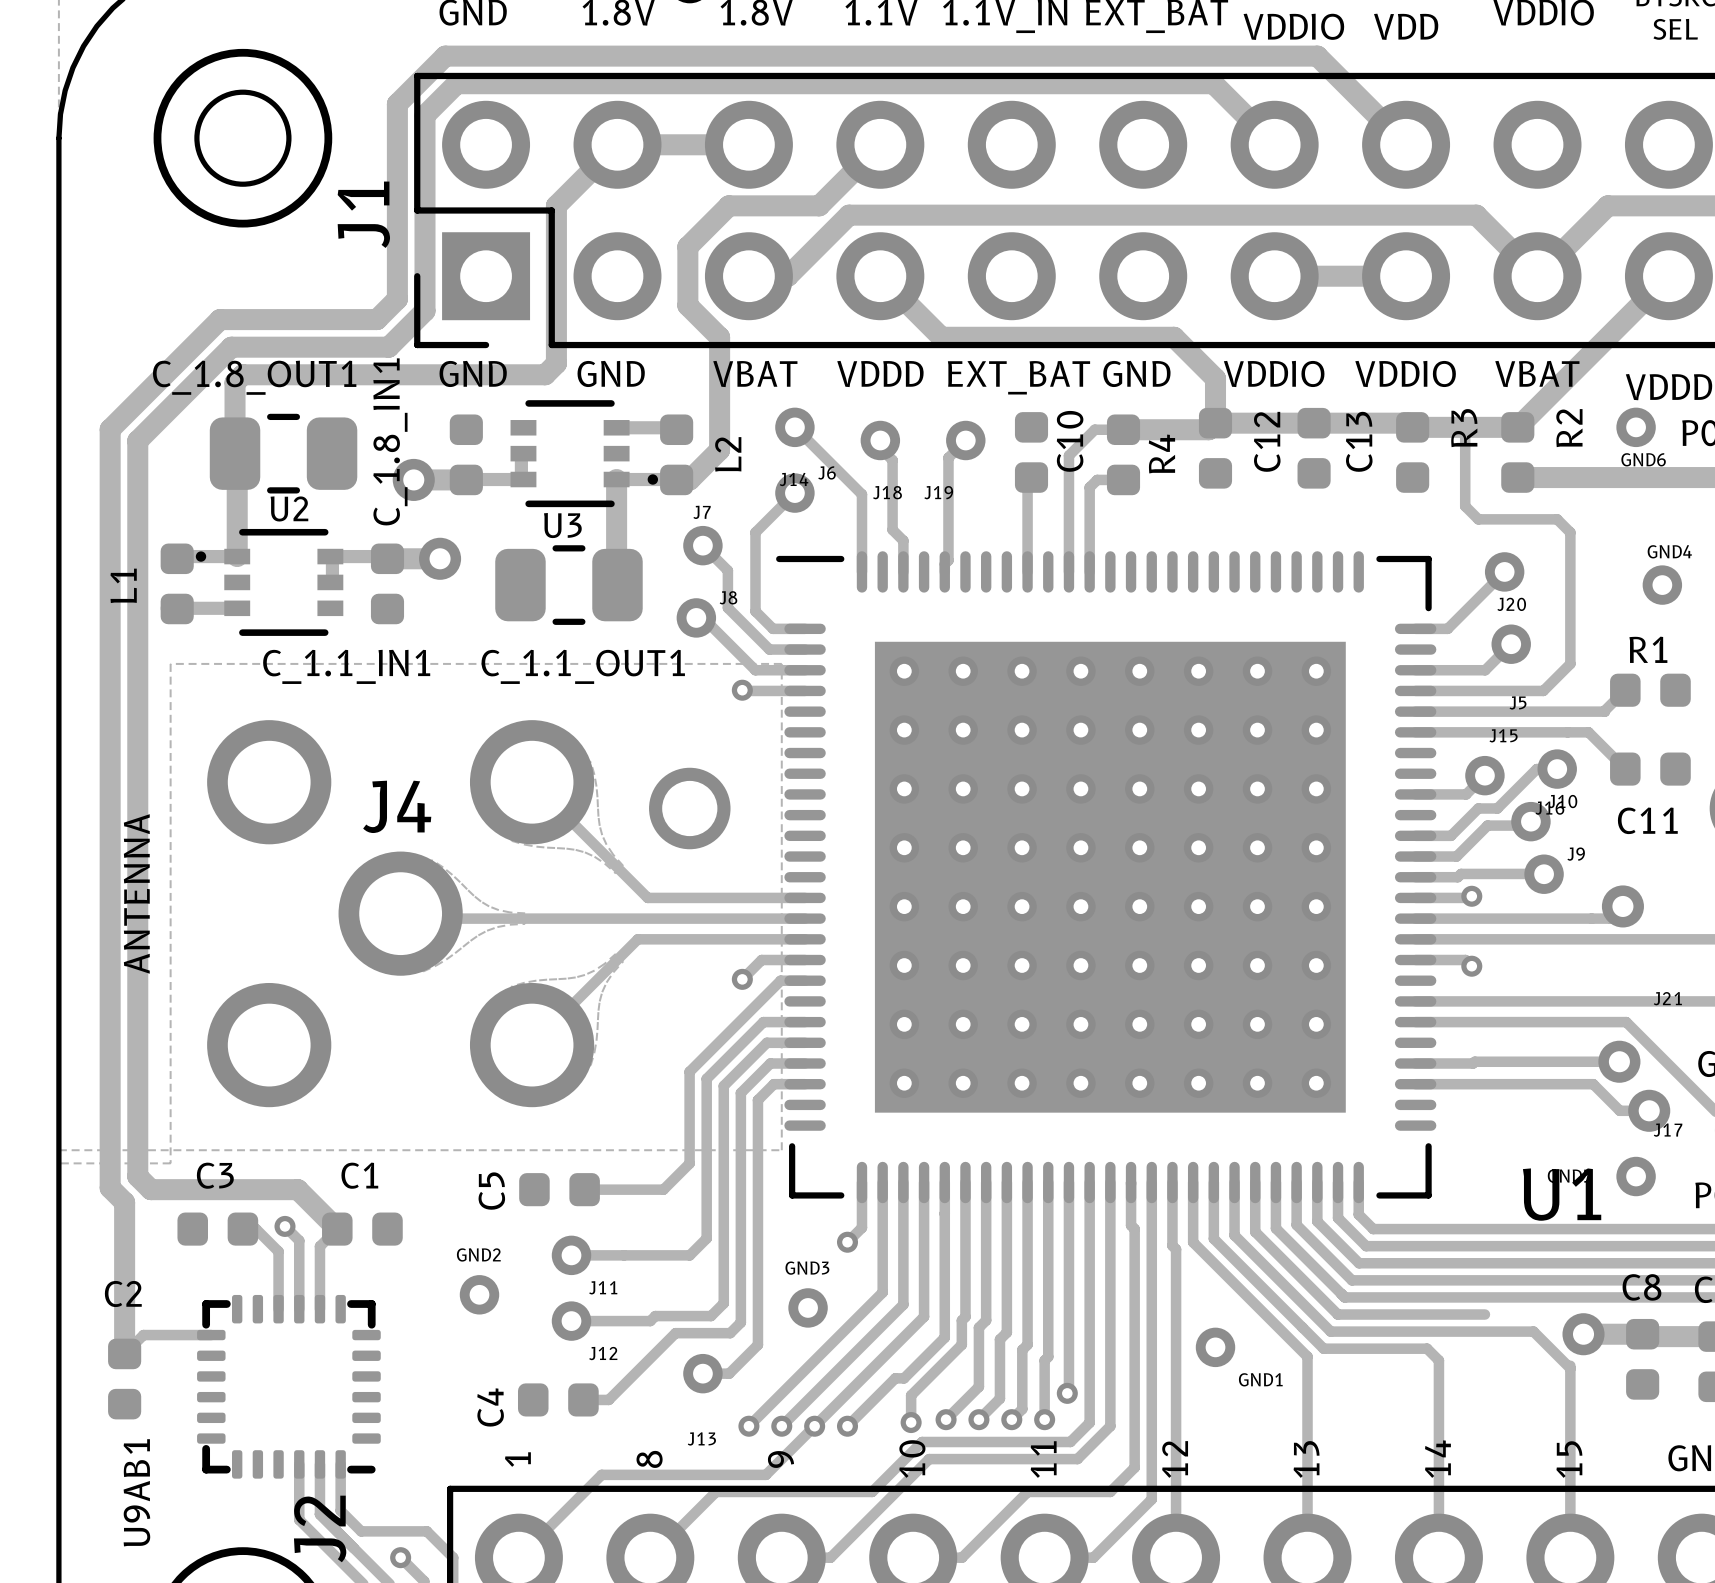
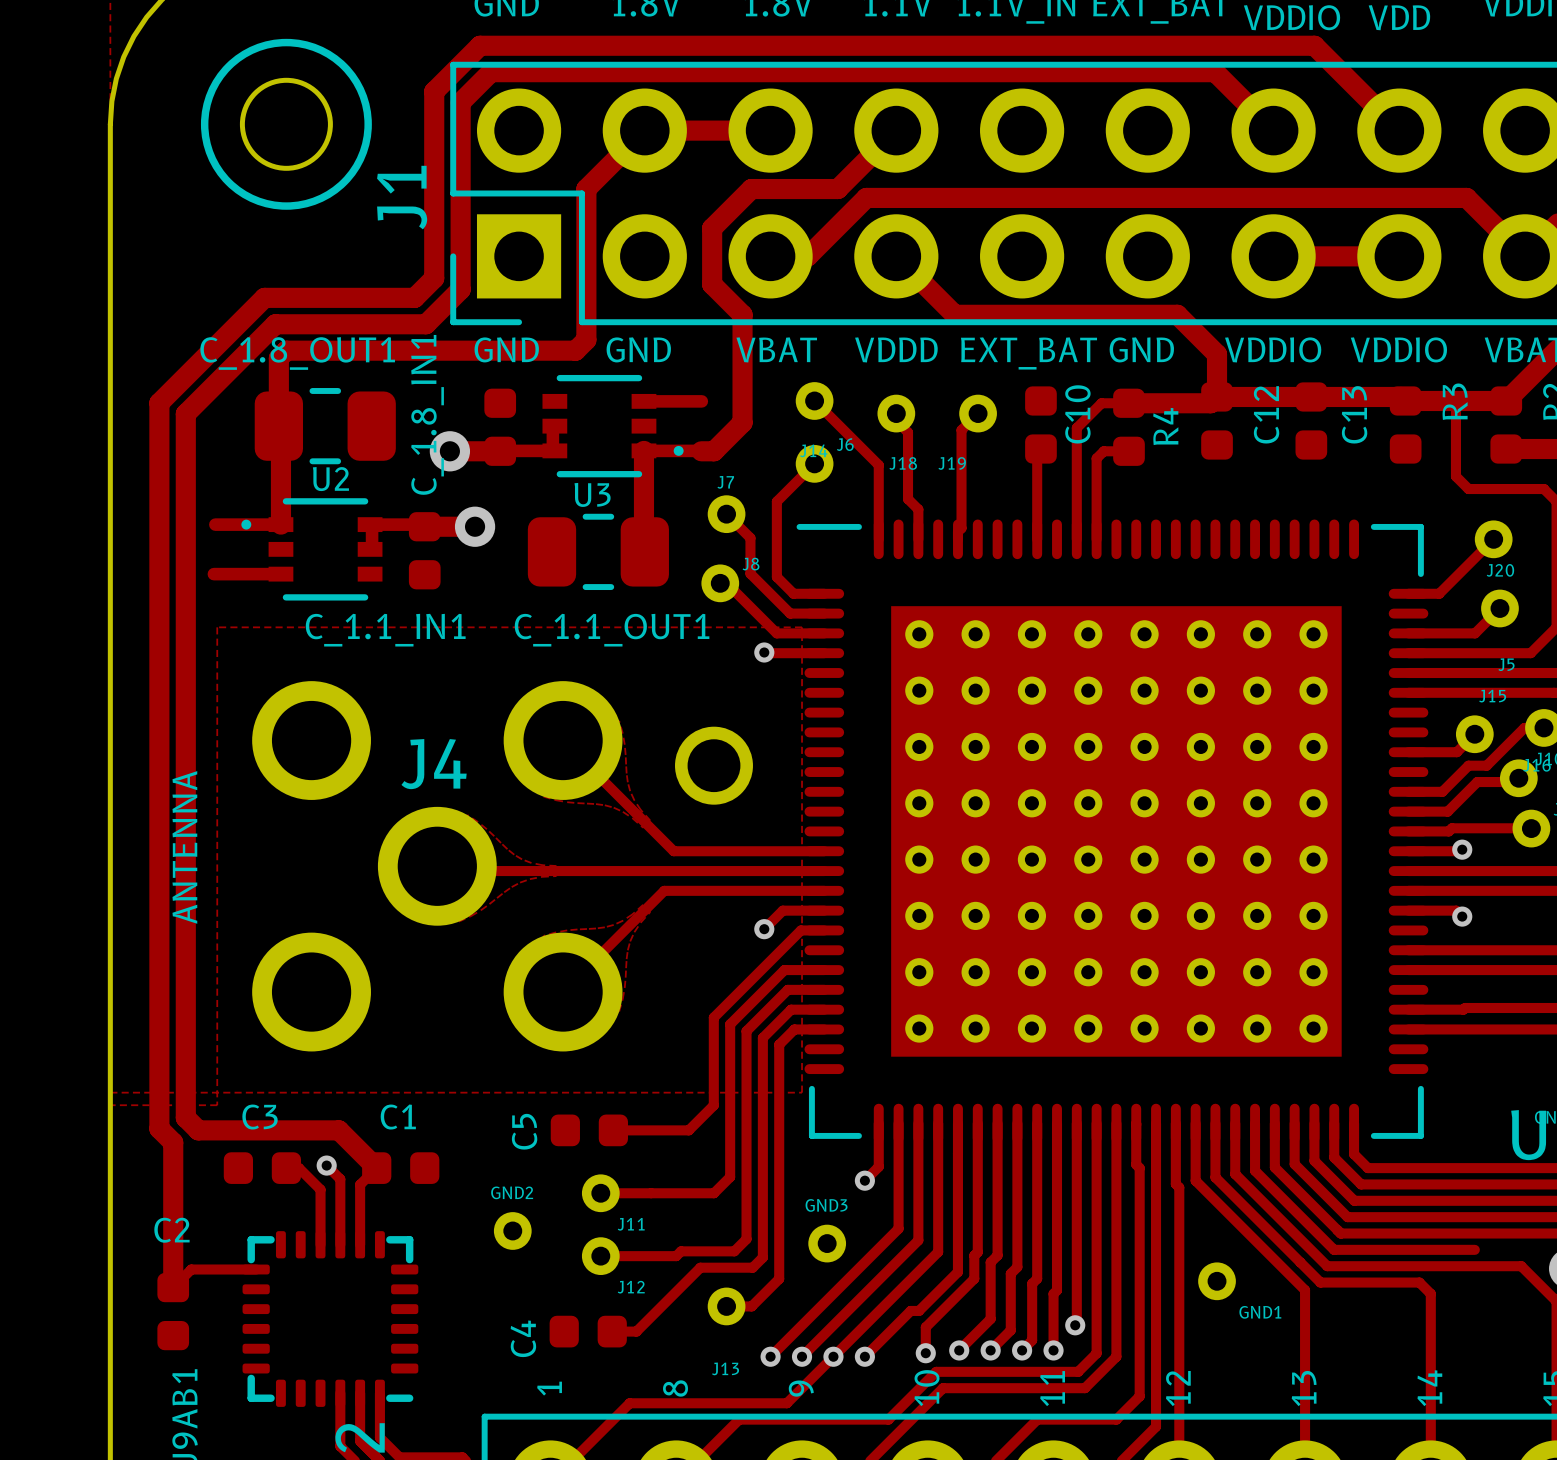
L2: (676, 454) -> none
L1: (177, 583) -> none

